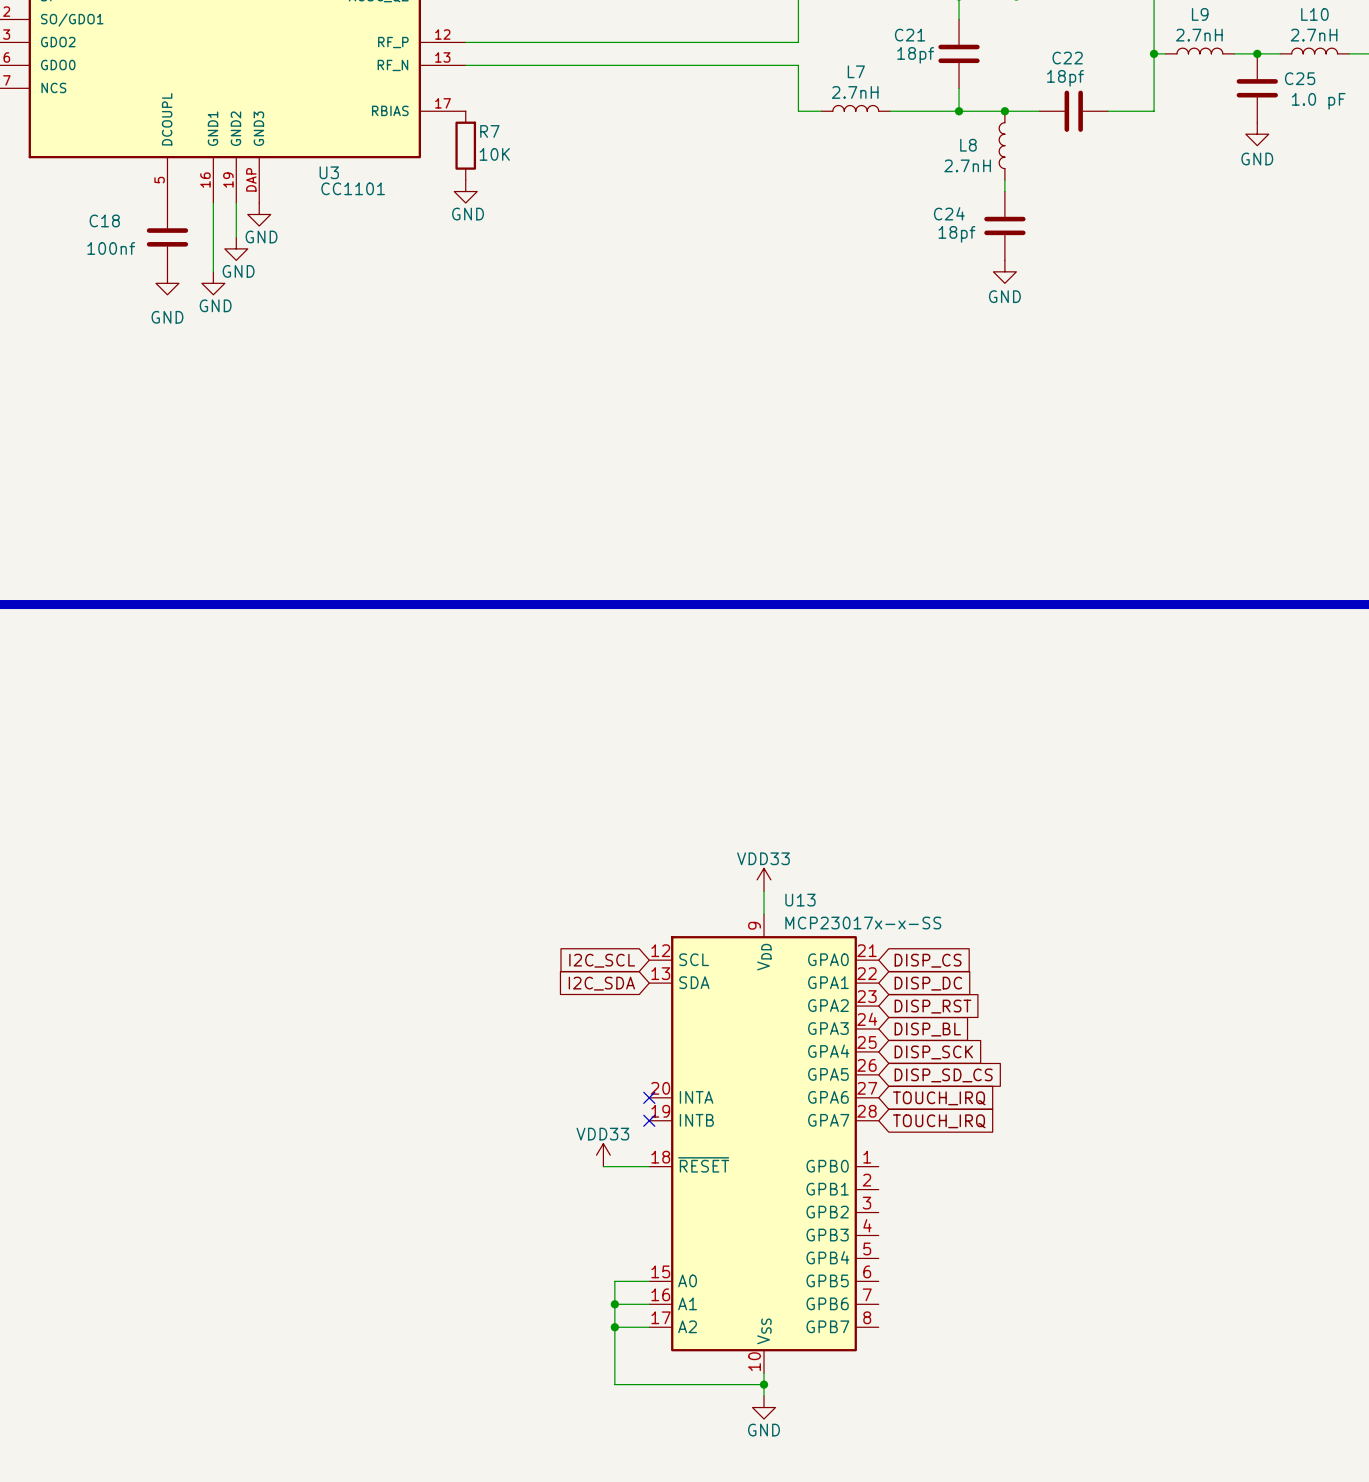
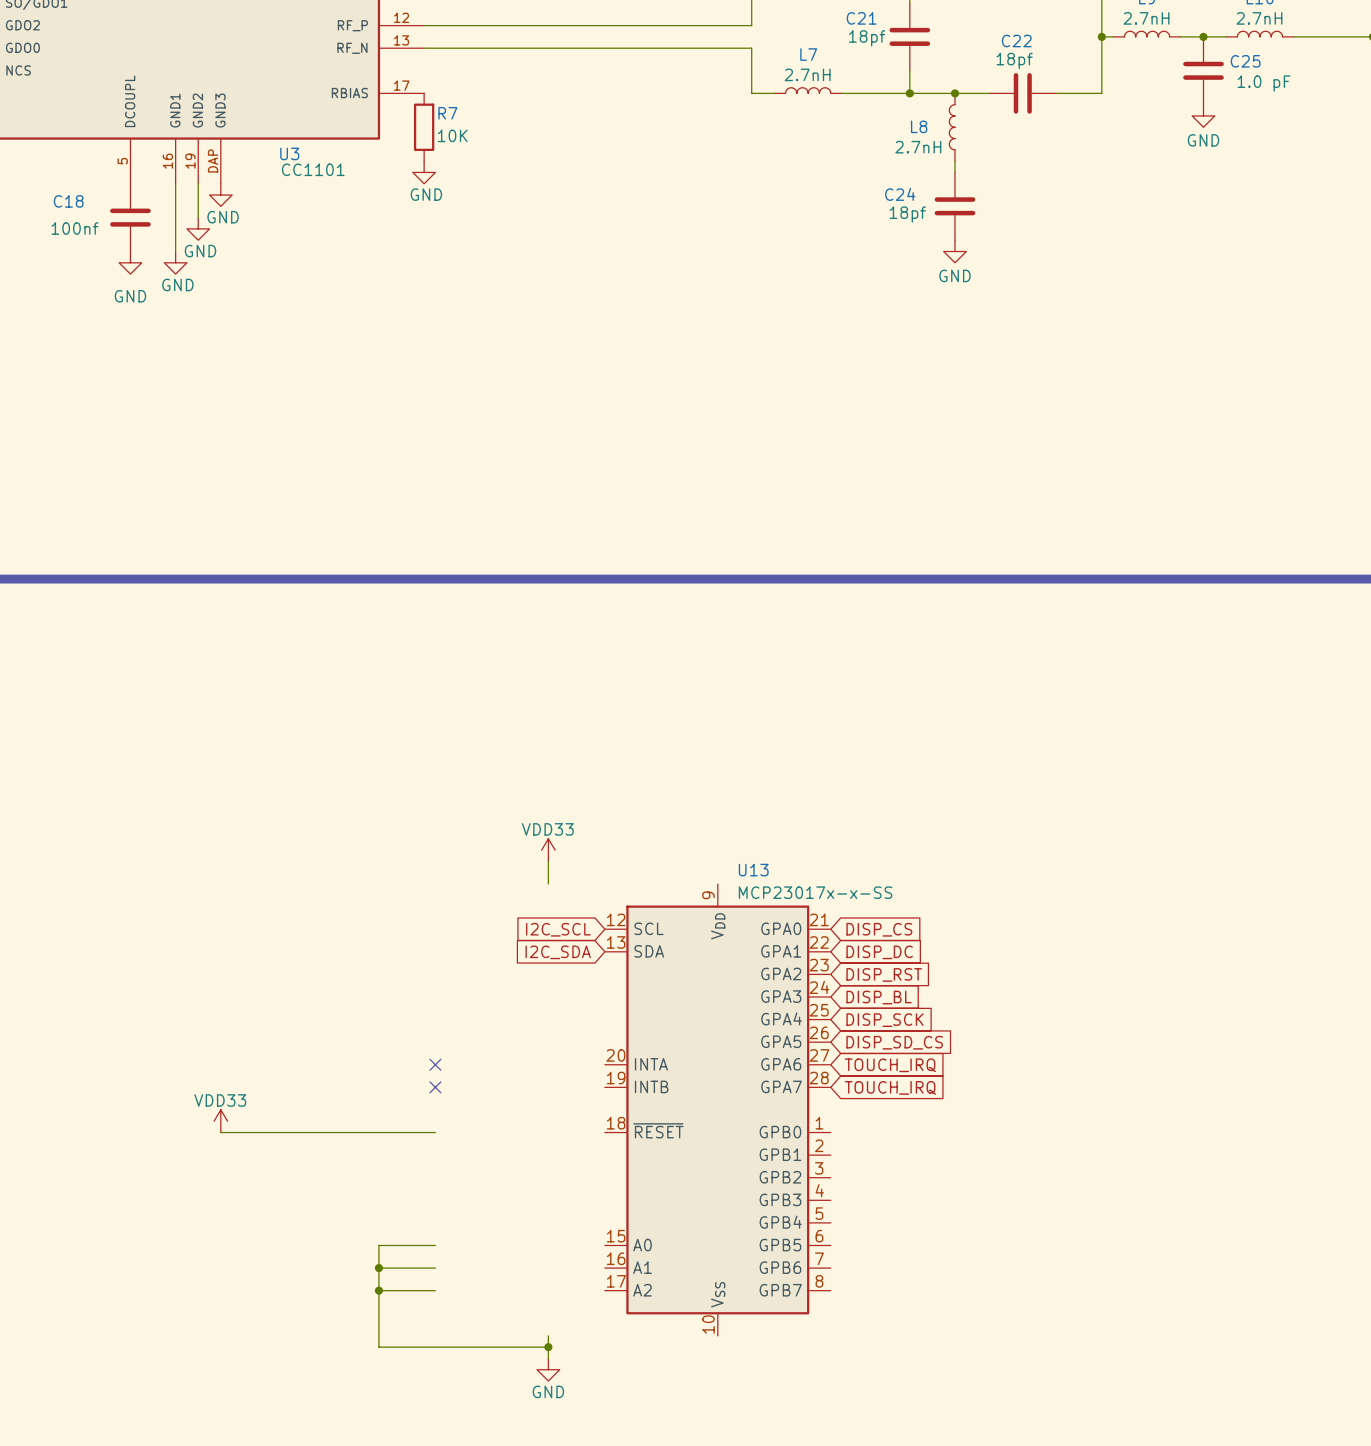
power symbol: none -> VDD33 (548, 850)
power symbol: VDD33 (764, 879) -> none
wire: (764, 891) (764, 914) -> (548, 861) (548, 884)
no-connect mark: none -> (435, 1064)
no-connect mark: (649, 1097) -> none
no-connect mark: none -> (435, 1087)
no-connect mark: (649, 1120) -> none
power symbol: none -> VDD33 (220, 1121)
power symbol: VDD33 (603, 1155) -> none
wire: none -> (220, 1132) (435, 1132)
wire: (603, 1166) (649, 1166) -> none
wire: none -> (435, 1245) (378, 1245) (378, 1347) (548, 1347)
wire: (649, 1281) (614, 1281) (614, 1384) (764, 1384) -> none
wire: none -> (378, 1268) (435, 1268)
junction: none -> (378, 1268)
wire: (614, 1304) (649, 1304) -> none
junction: (614, 1304) -> none
wire: none -> (378, 1290) (435, 1290)
junction: none -> (378, 1290)
wire: (614, 1327) (649, 1327) -> none
junction: (614, 1327) -> none
wire: (764, 1373) (764, 1396) -> (548, 1335) (548, 1358)
junction: none -> (548, 1347)
junction: (764, 1384) -> none
power symbol position: GND (764, 1407) -> GND (548, 1369)

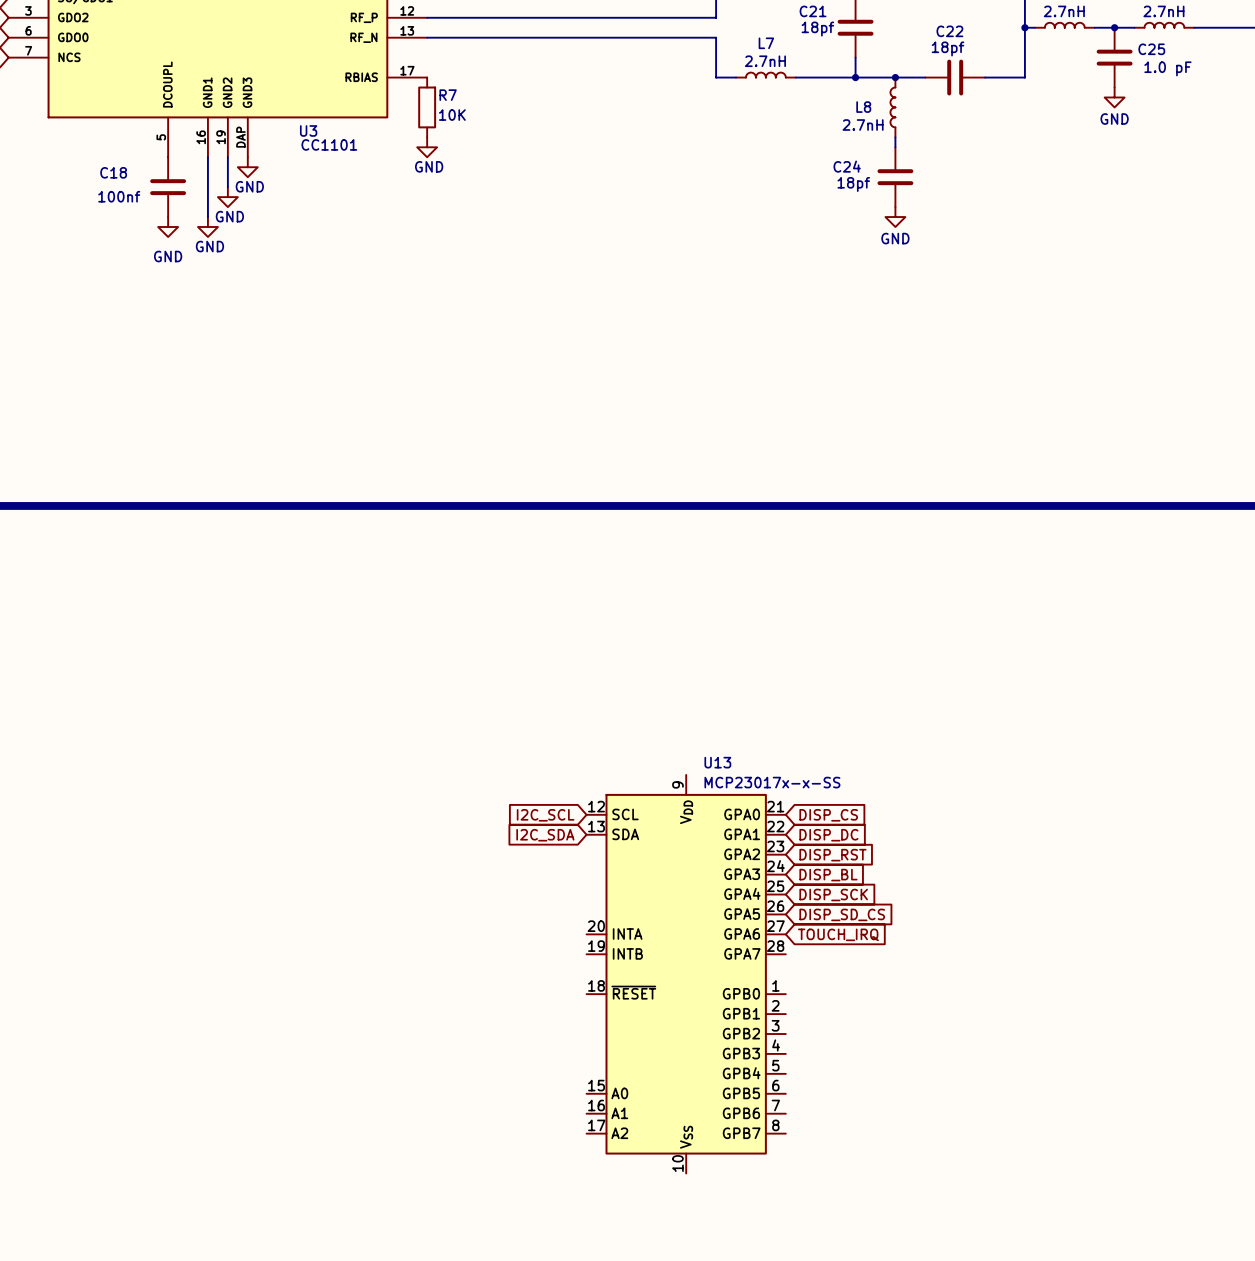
power symbol: VDD33 (548, 850) -> none
wire: (548, 861) (548, 884) -> none
no-connect mark: (435, 1064) -> none
no-connect mark: (435, 1087) -> none
global label: TOUCH_IRQ (890, 1087) -> none
power symbol: VDD33 (220, 1121) -> none
wire: (220, 1132) (435, 1132) -> none
wire: (435, 1245) (378, 1245) (378, 1347) (548, 1347) -> none
wire: (378, 1268) (435, 1268) -> none
junction: (378, 1268) -> none
wire: (378, 1290) (435, 1290) -> none
junction: (378, 1290) -> none
wire: (548, 1335) (548, 1358) -> none
junction: (548, 1347) -> none
power symbol: GND (548, 1369) -> none

